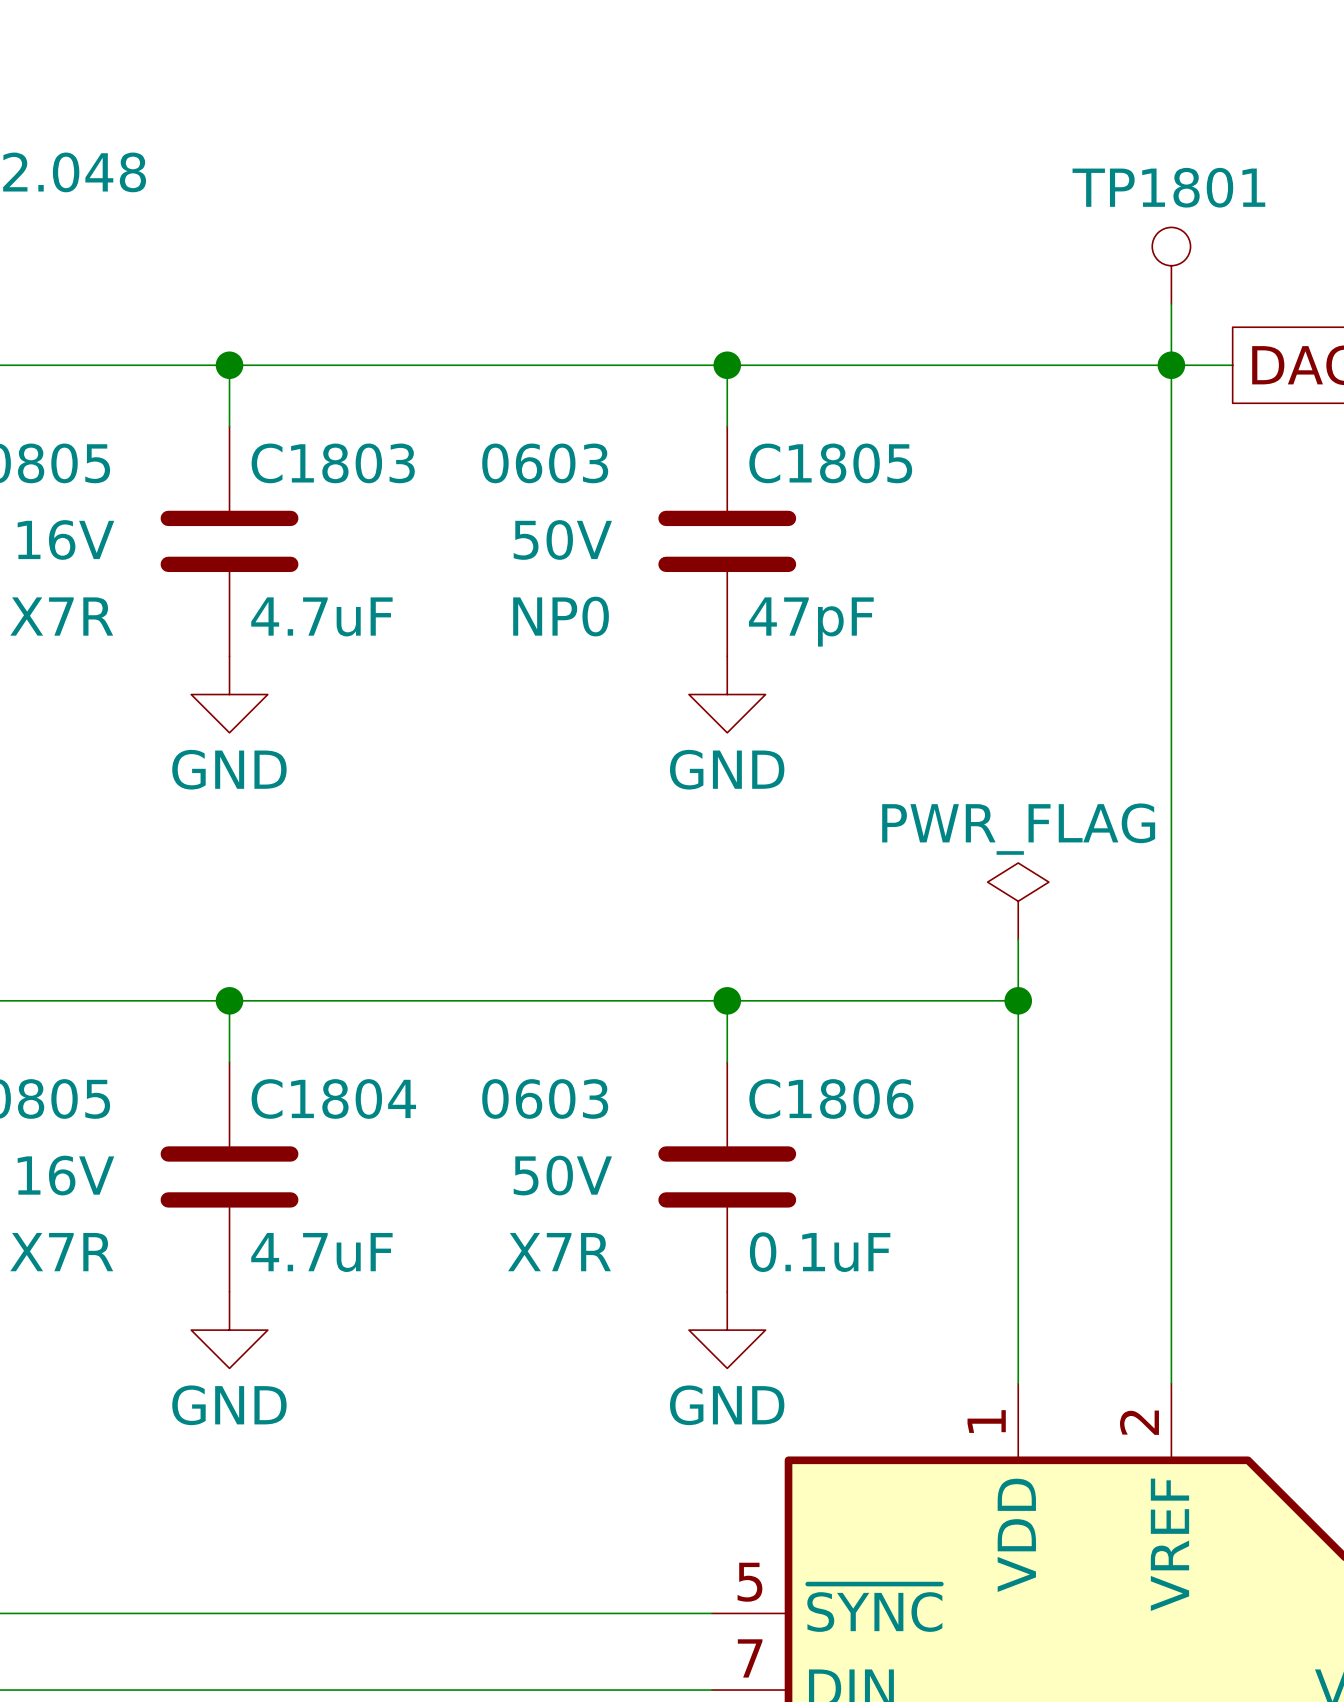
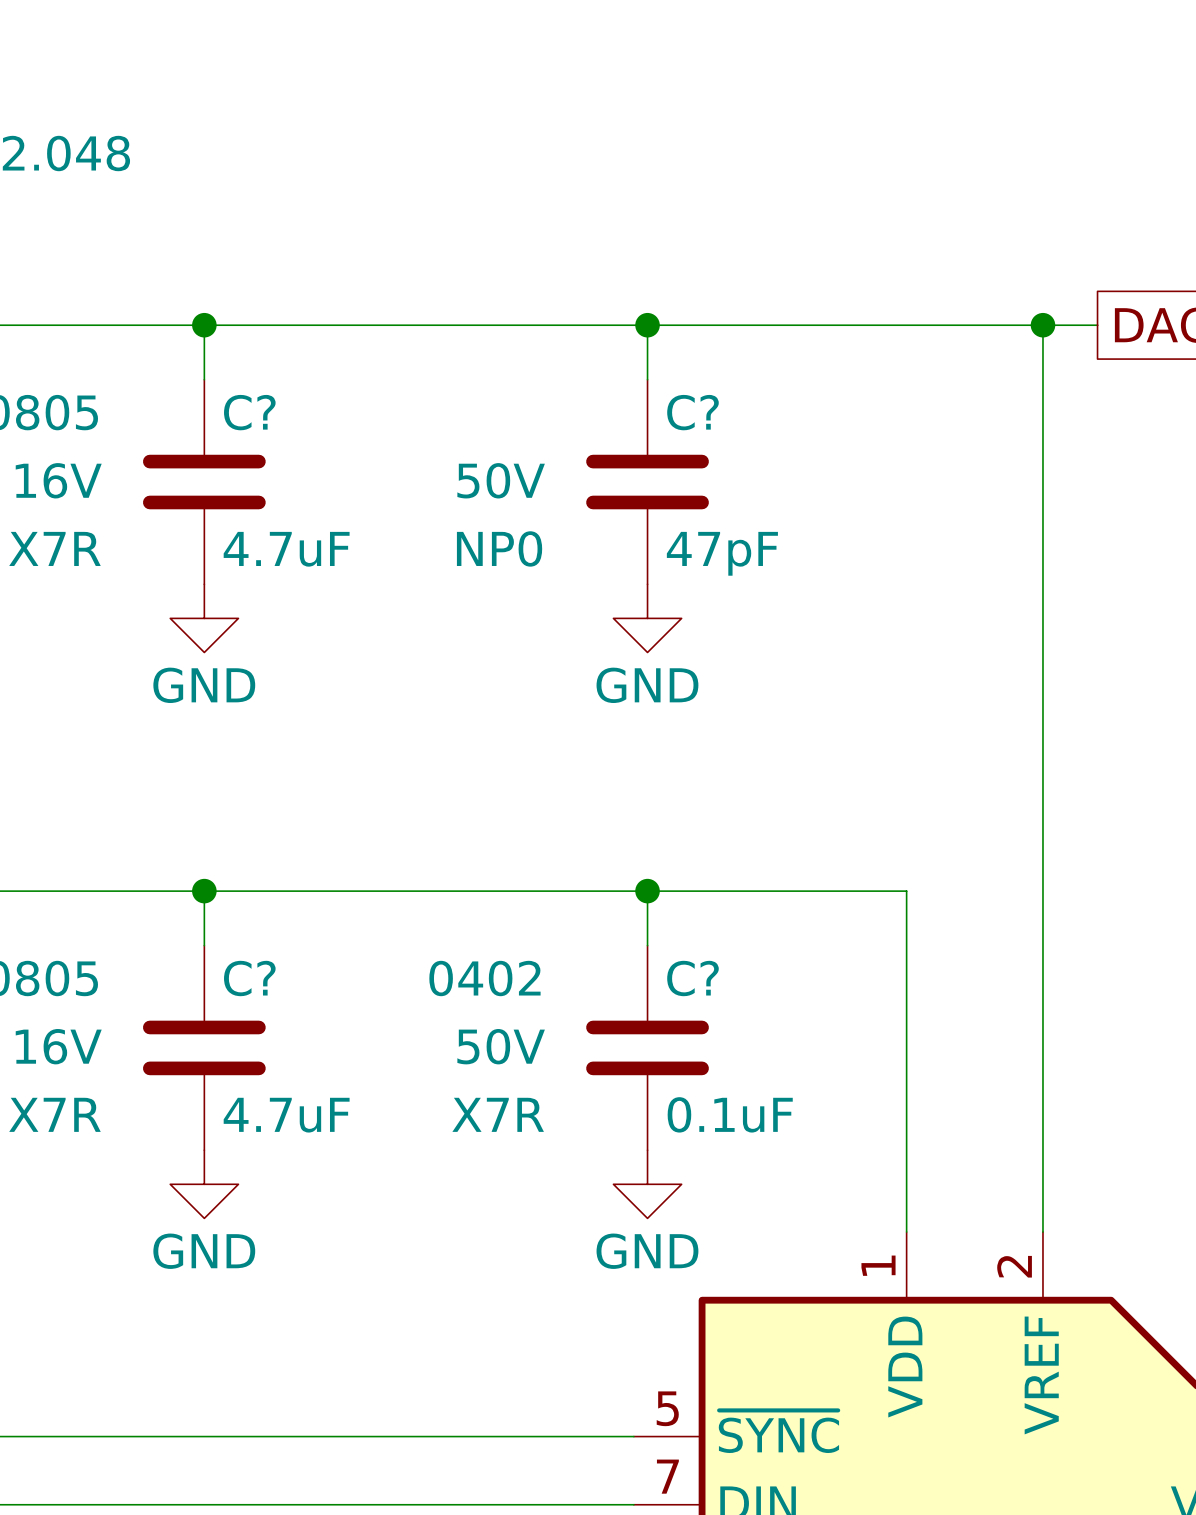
TP1801: (1171, 265) -> none
wire: (1171, 303) (1171, 365) -> none
C1803 name: C1803 (333, 463) -> C? (249, 412)
C1805 text: 0603 (545, 463) -> none
C1805 name: C1805 (830, 463) -> C? (692, 412)
power symbol: PWR_FLAG (1018, 901) -> none
wire: (1018, 939) (1018, 1000) -> none
junction: (1018, 1000) -> none
C1804 name: C1804 (333, 1098) -> C? (249, 978)
C1806 text: 0603 (545, 1098) -> 0402 (484, 978)
C1806 name: C1806 (831, 1098) -> C? (692, 978)

